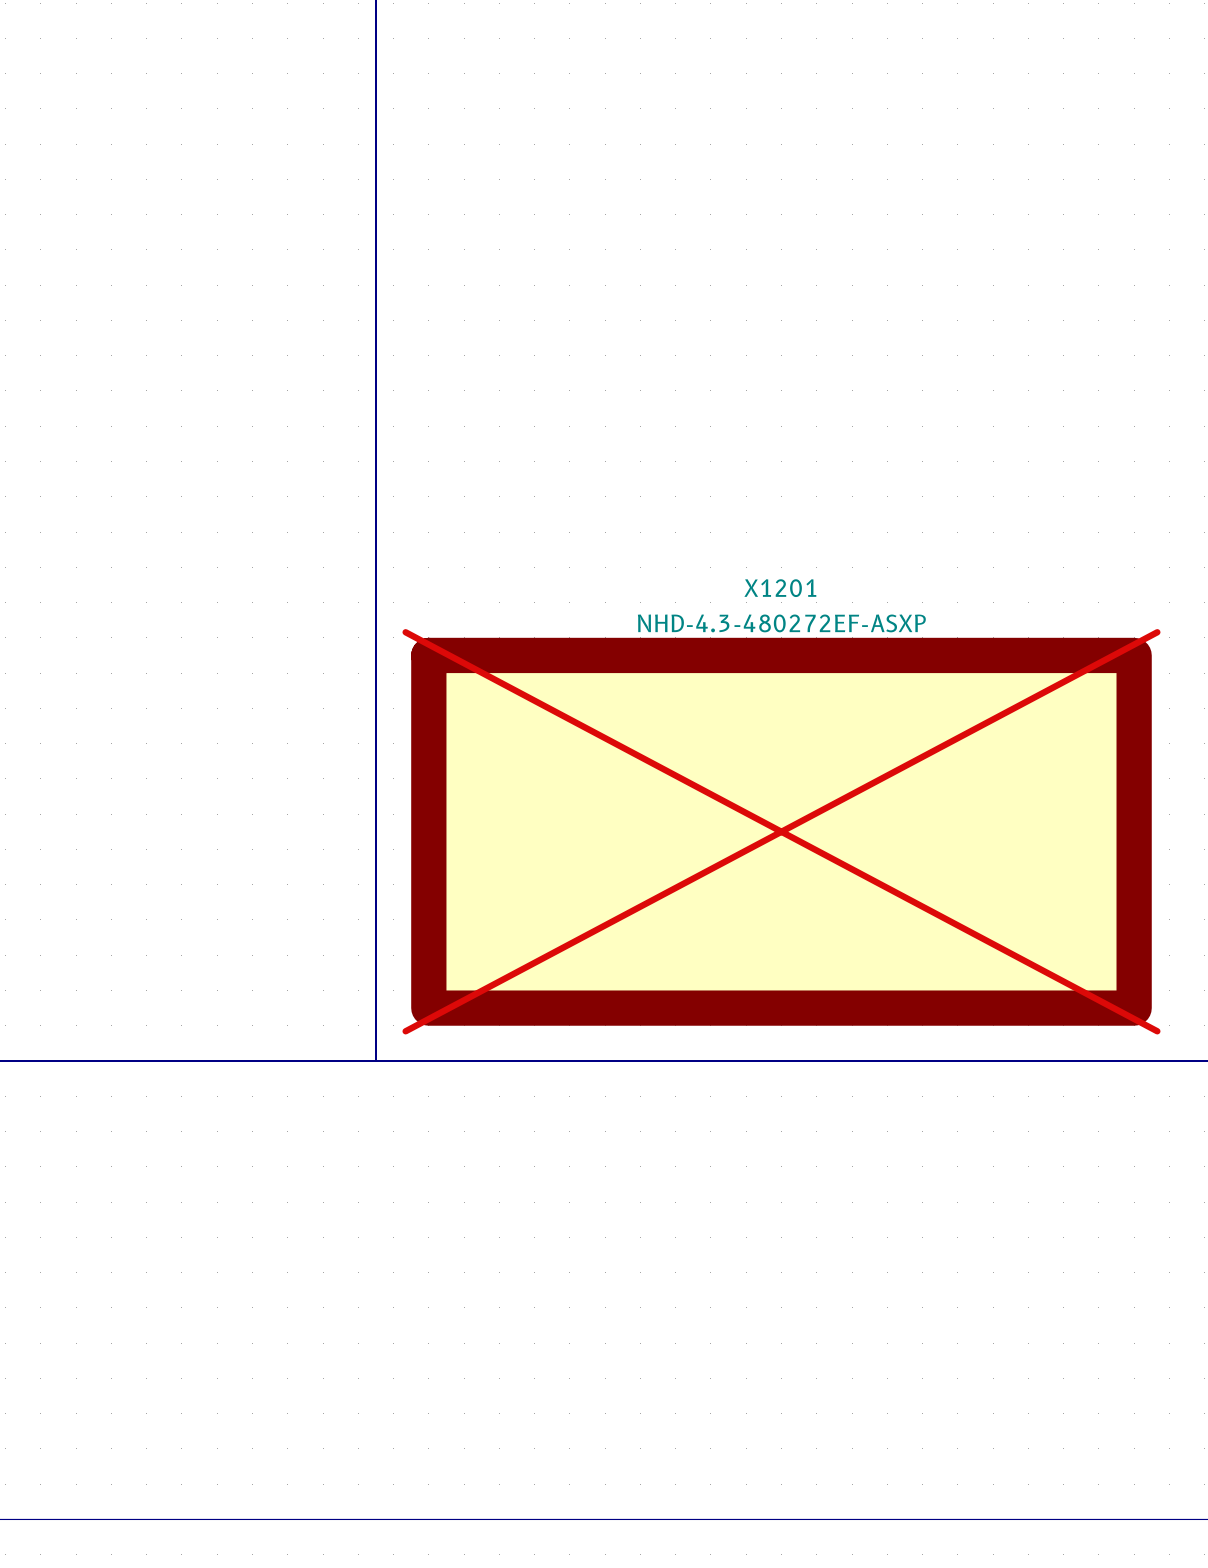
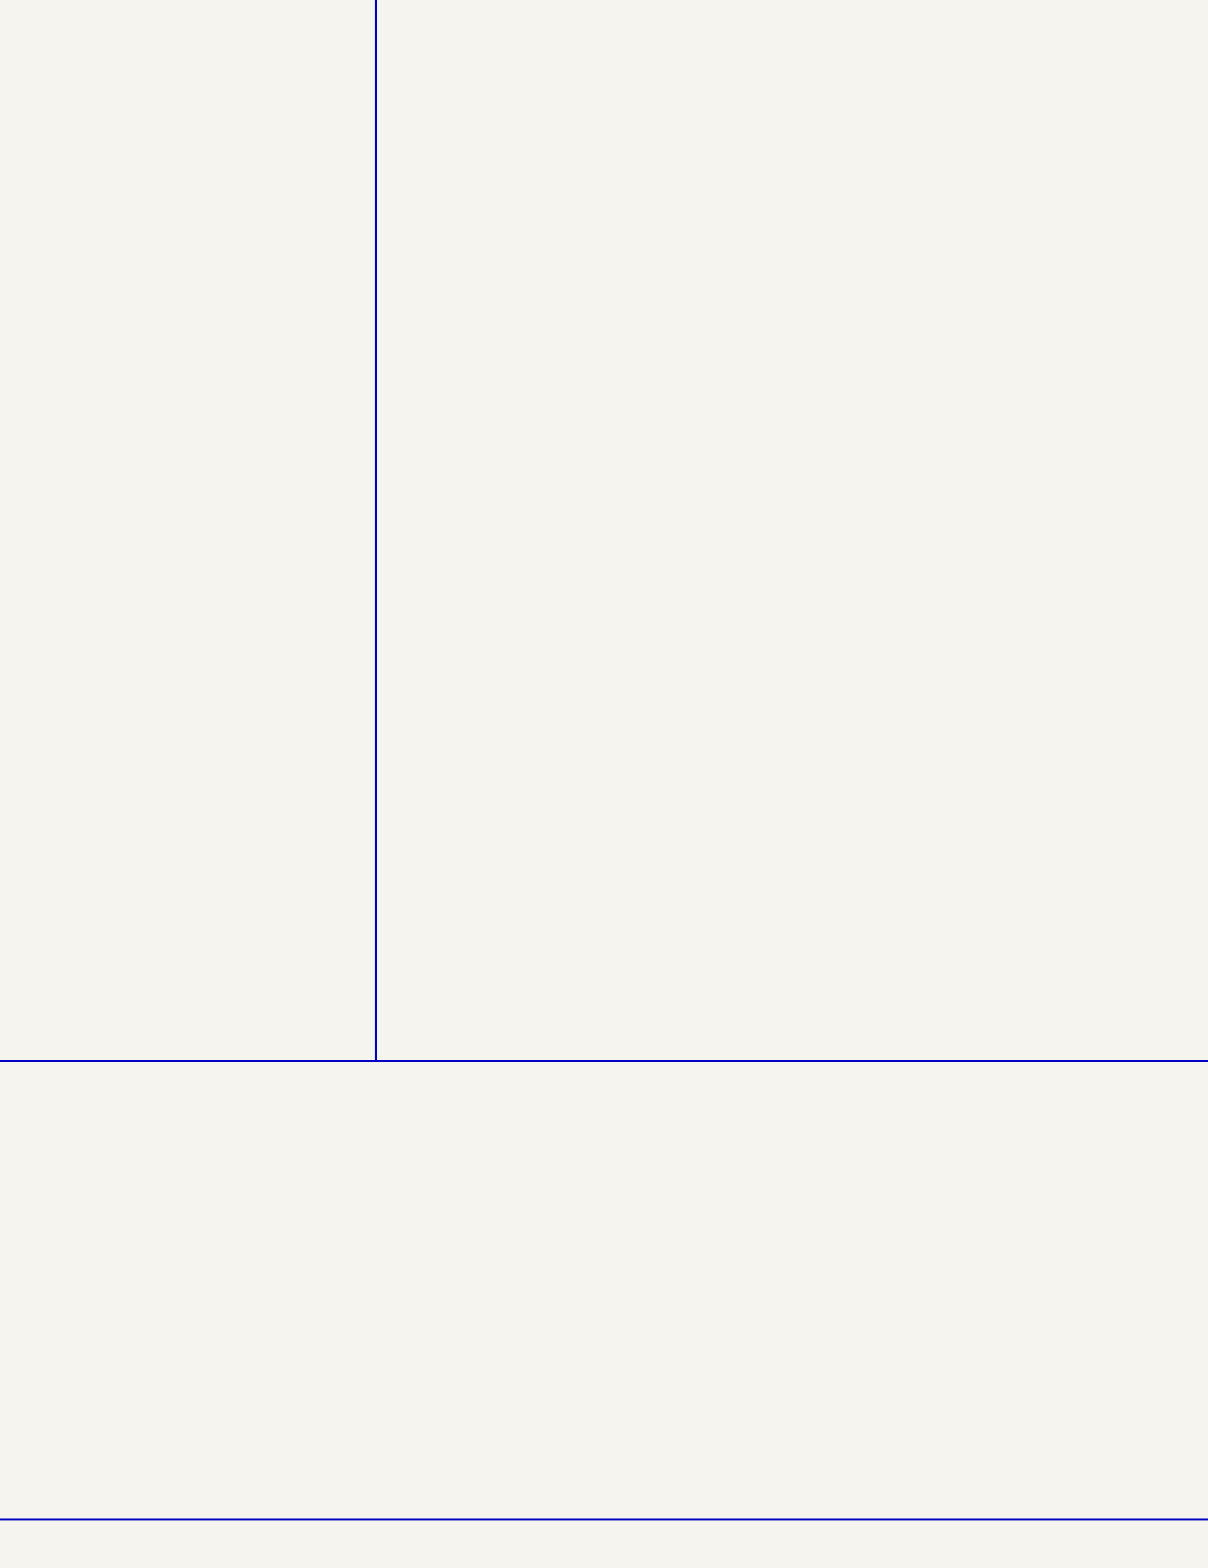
X1201: NHD-4.3-480272EF-ASXP (781, 831) -> none

